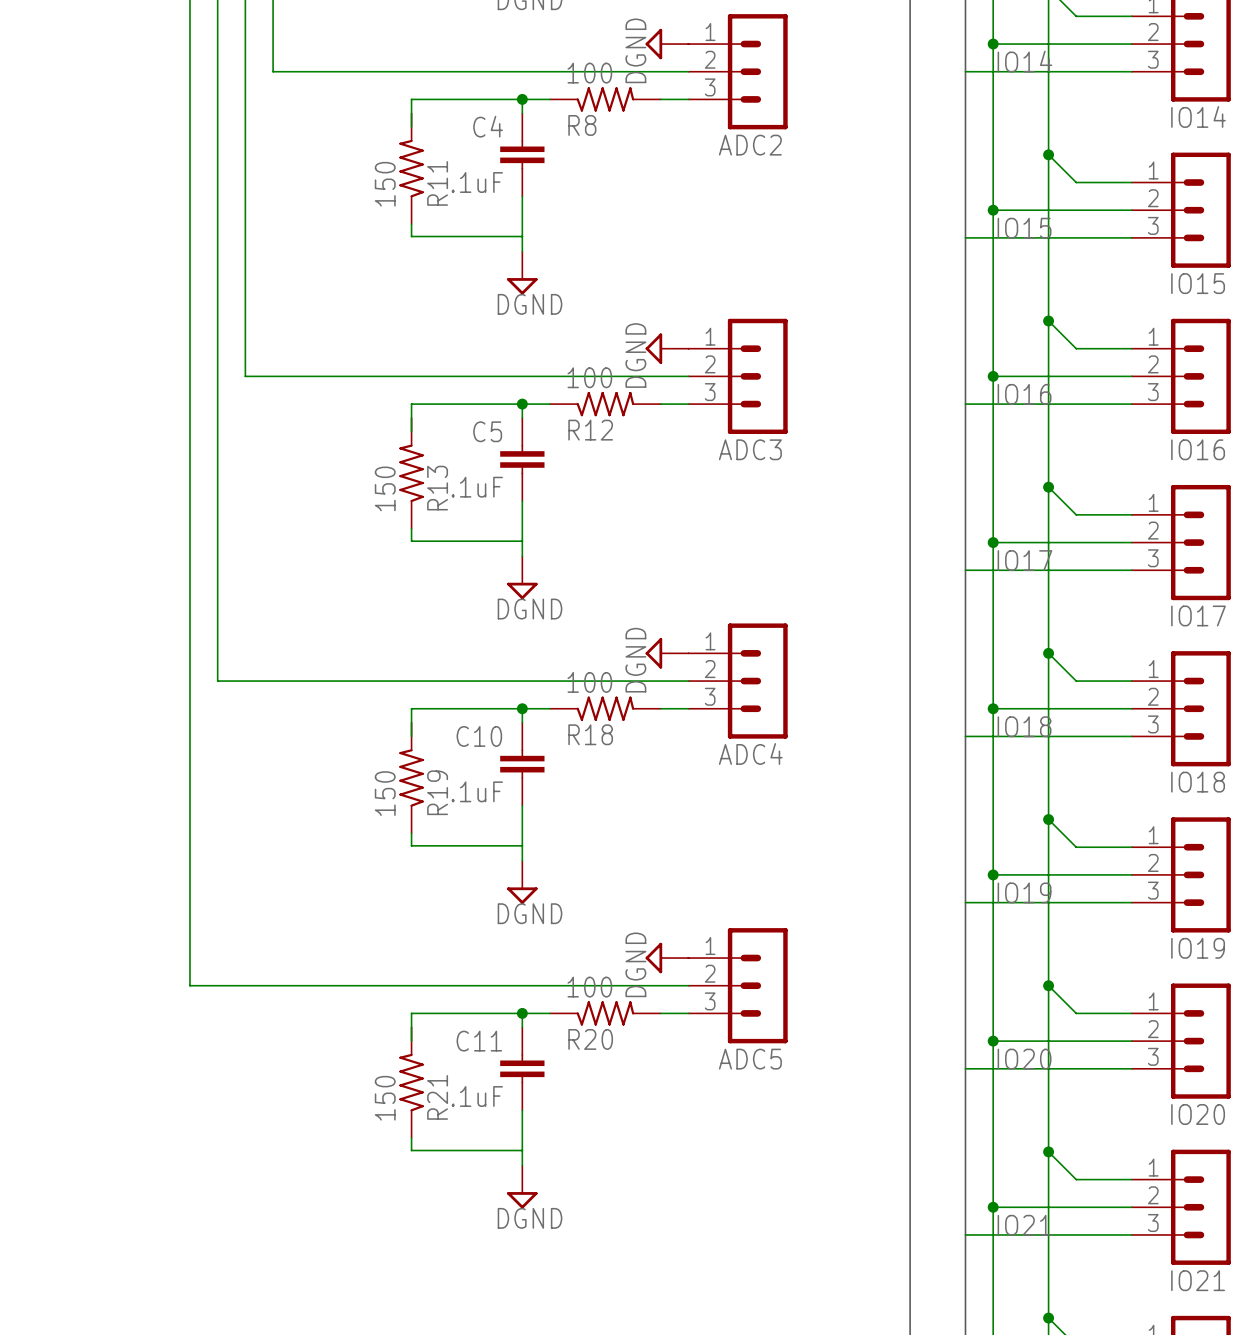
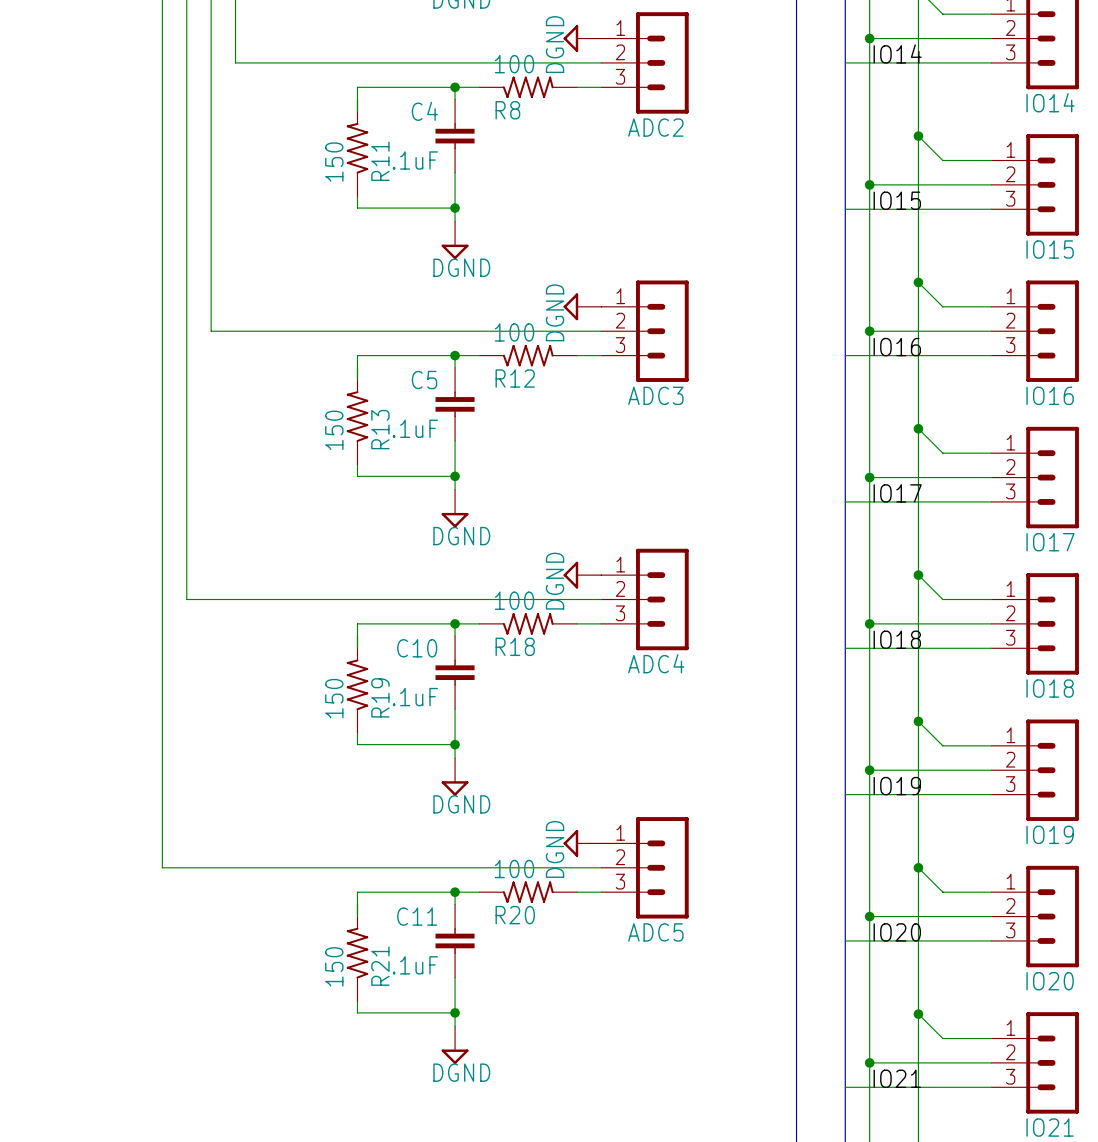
junction: none -> (455, 208)
junction: none -> (455, 476)
junction: none -> (455, 744)
junction: none -> (455, 1012)

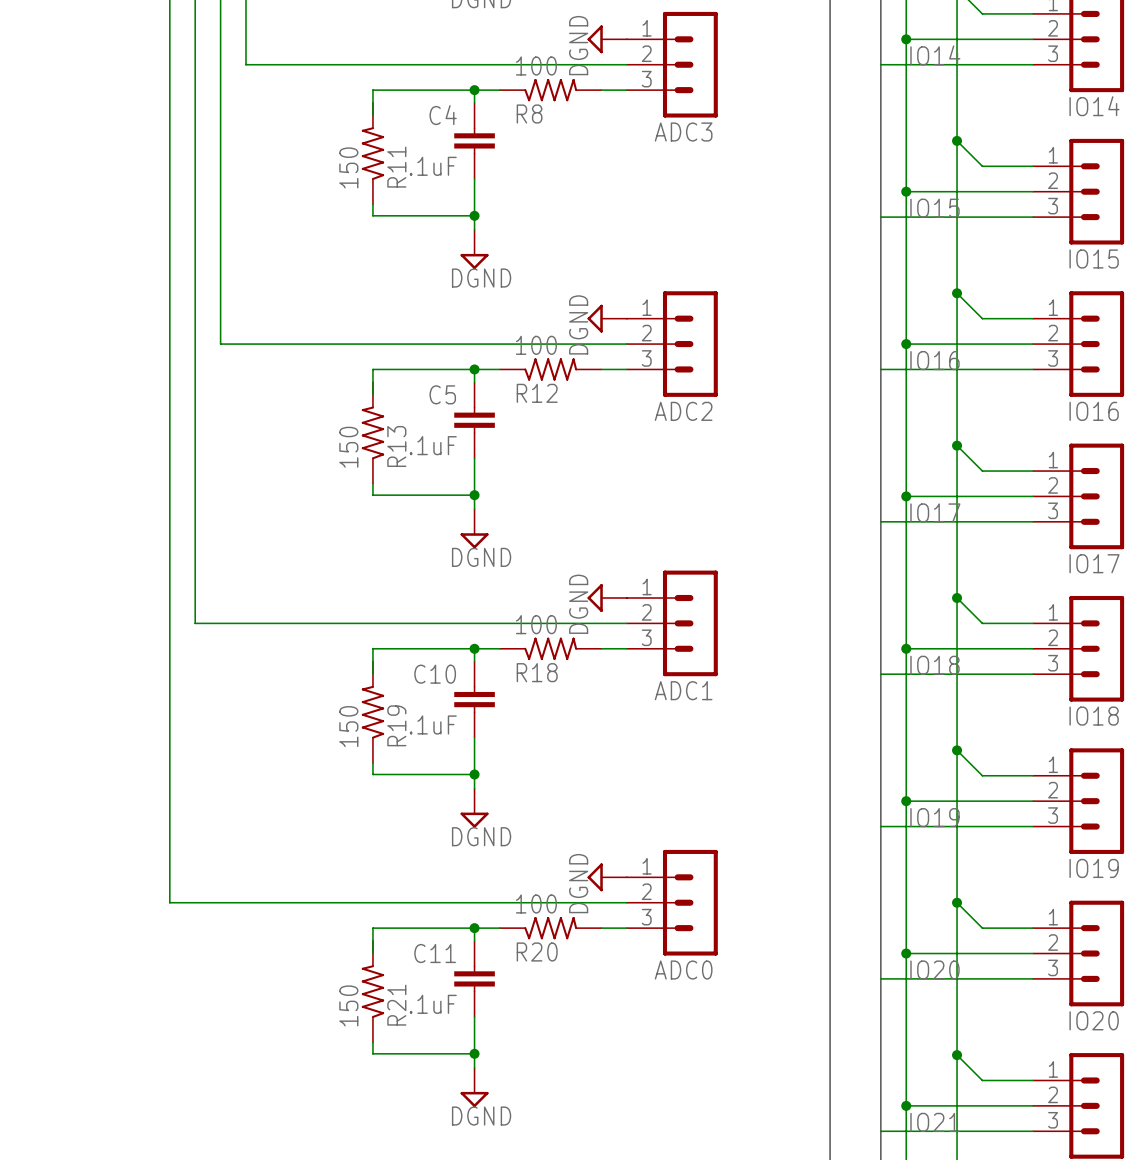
ADC2 name: ADC2 (655, 127) -> ADC3 (683, 132)
ADC3 name: ADC3 (655, 395) -> ADC2 (683, 411)
ADC4 name: ADC4 (656, 663) -> ADC1 (683, 690)
ADC5 name: ADC5 (655, 932) -> ADC0 (683, 970)

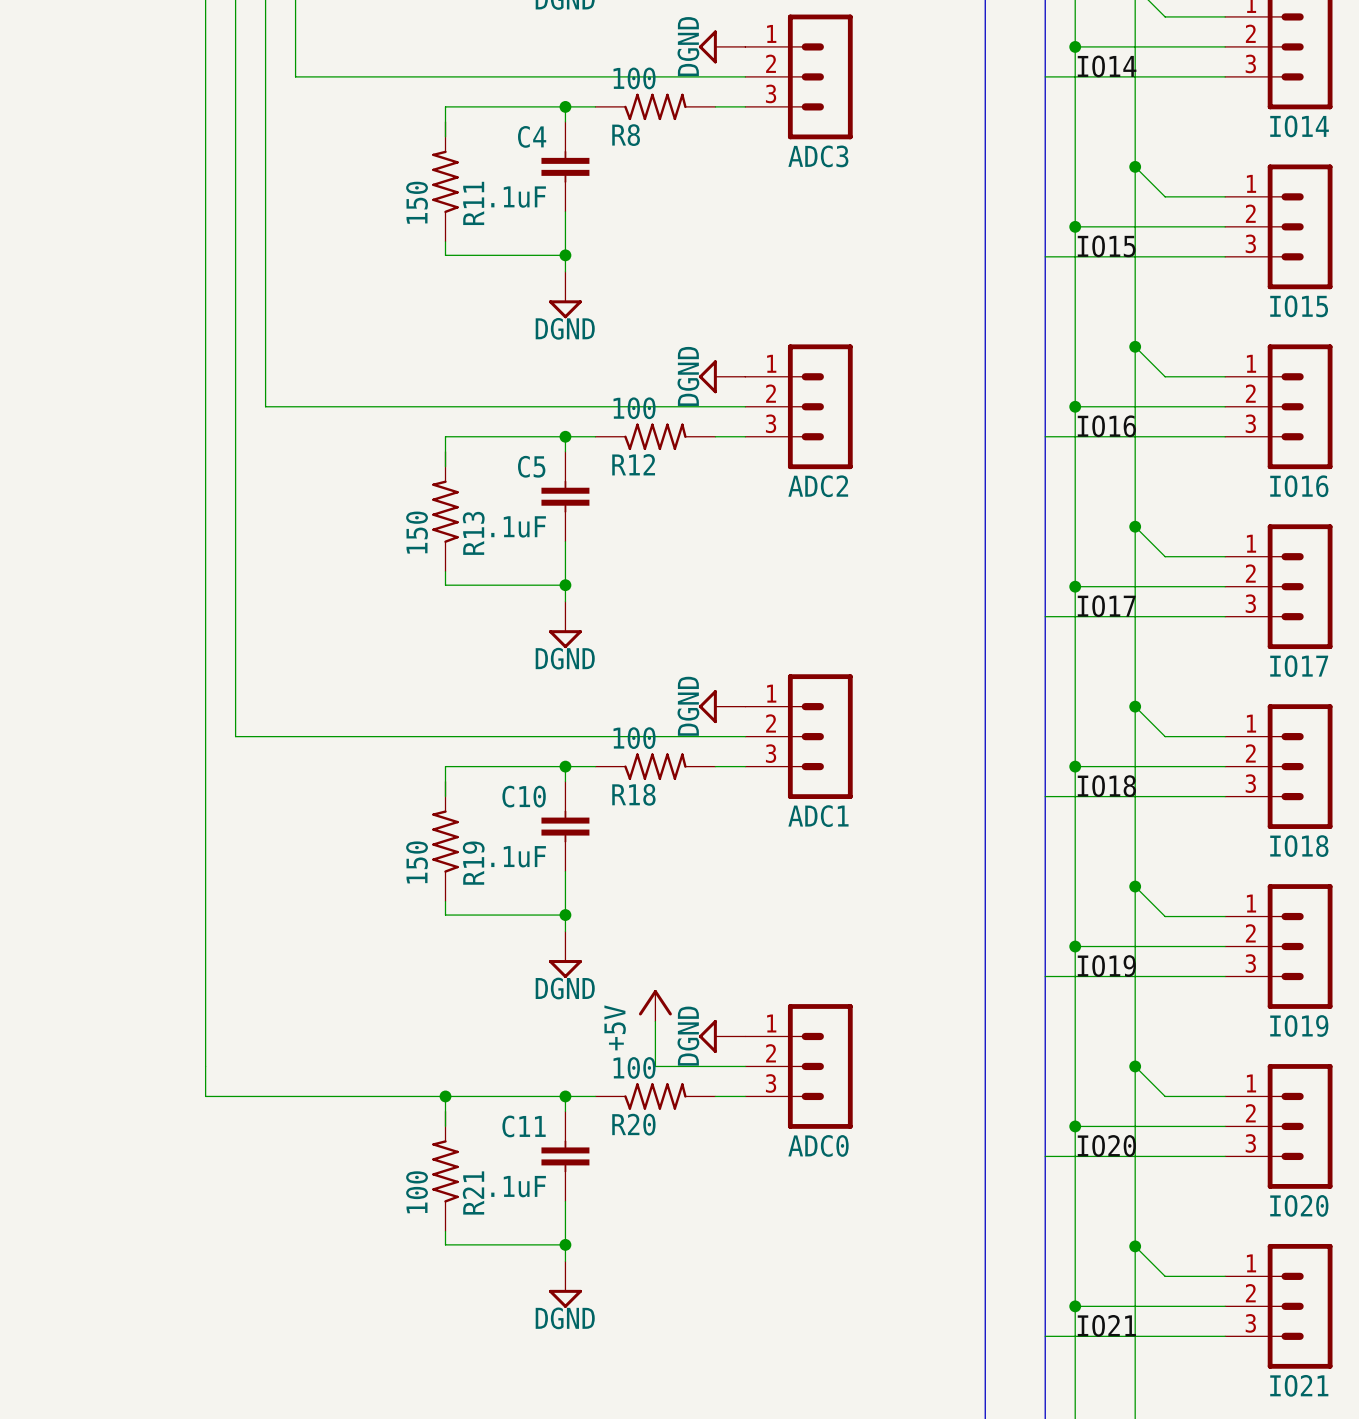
power symbol: none -> +5V (655, 1005)
wire: none -> (655, 1021) (655, 1066)
wire: (169, 902) (550, 902) -> (205, 1066) (205, 1096) (445, 1096)
junction: none -> (445, 1096)
R21 value: 150 (348, 1005) -> 100 (417, 1192)

